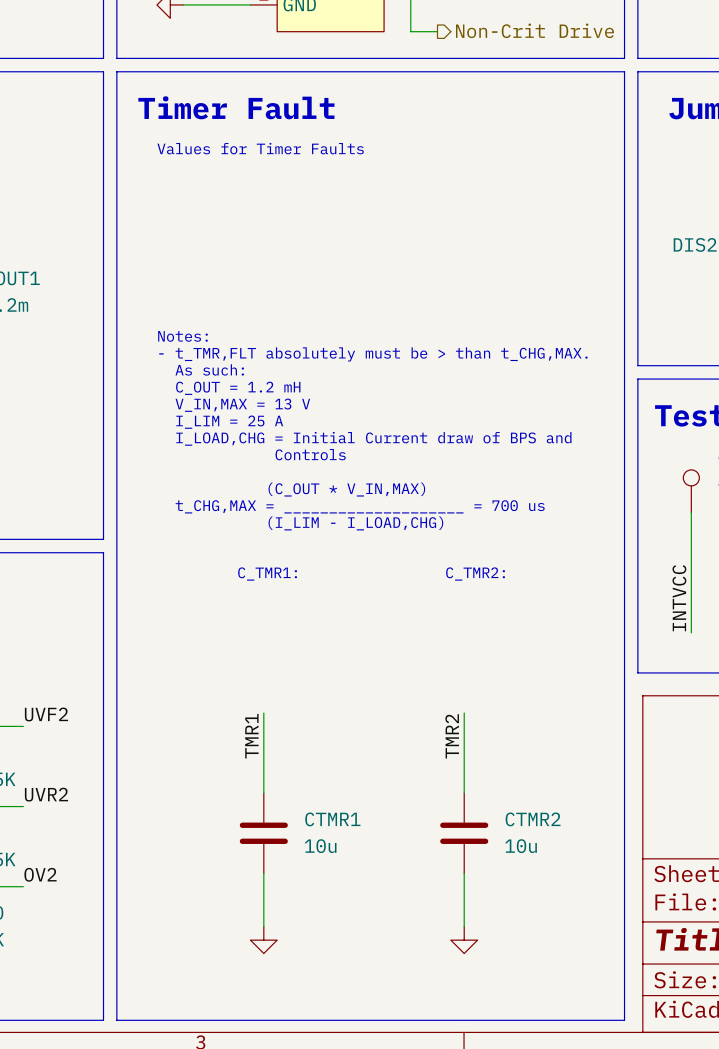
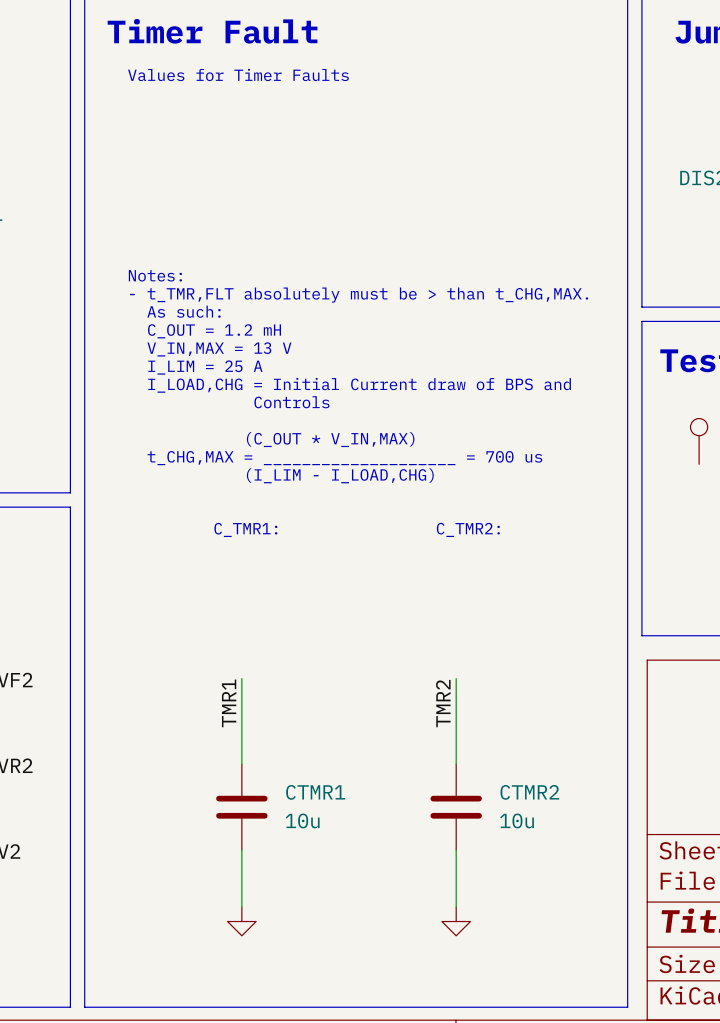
wire: (691, 512) (691, 632) -> none
label: INTVCC (679, 598) -> none

